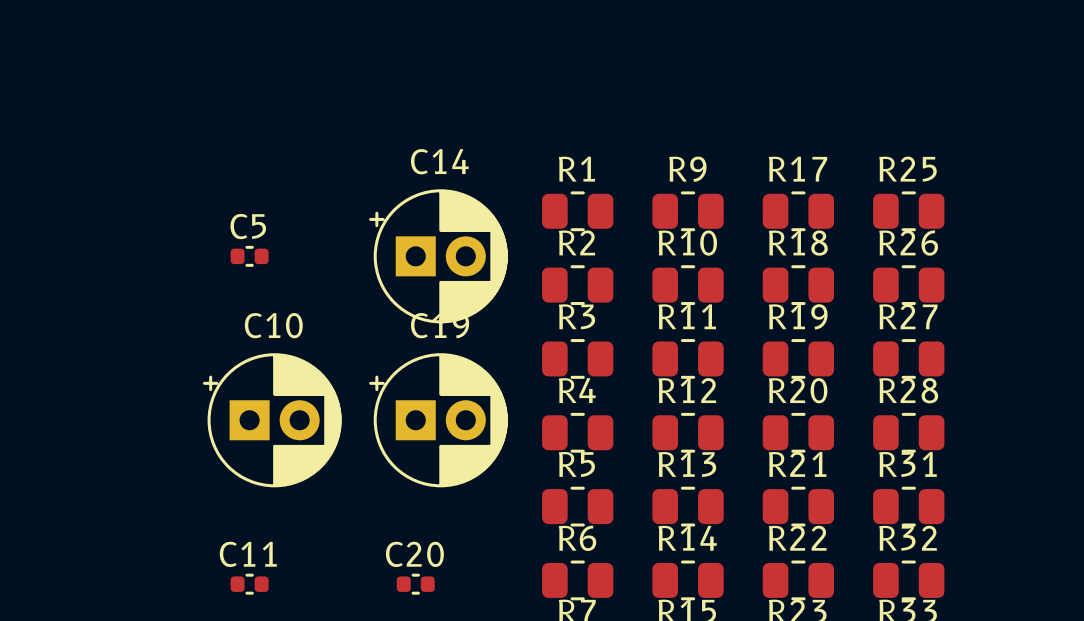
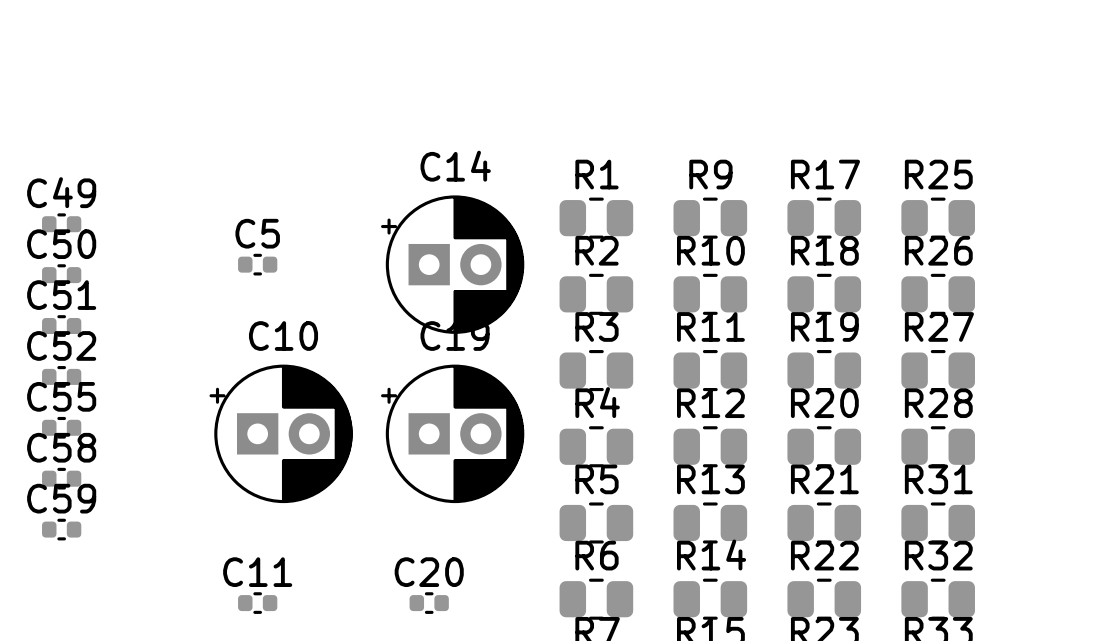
C49: none -> (61, 224)
C50: none -> (61, 275)
C51: none -> (61, 325)
C52: none -> (61, 376)
C55: none -> (61, 427)
C58: none -> (61, 478)
C59: none -> (61, 529)

